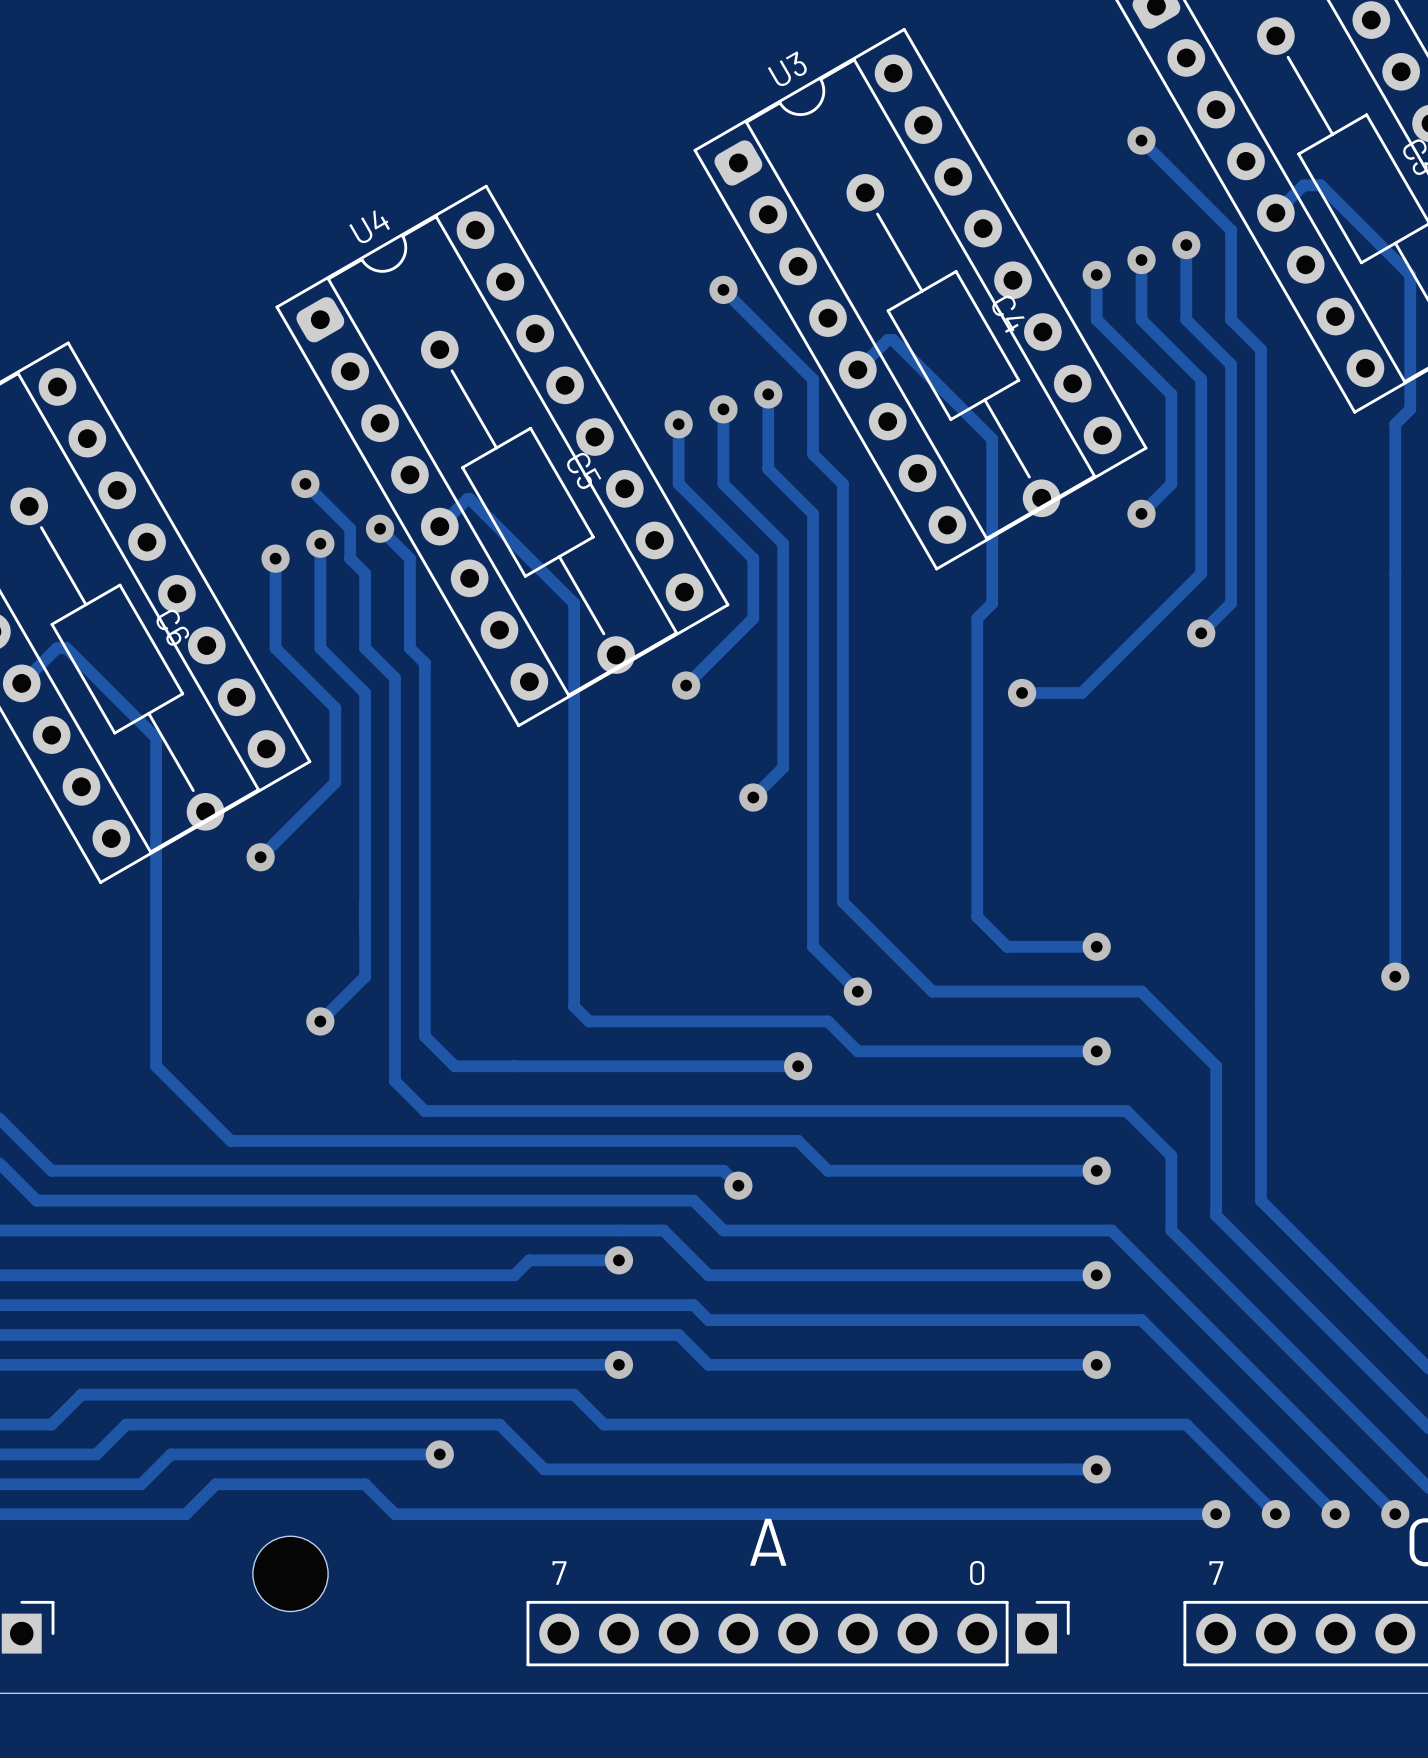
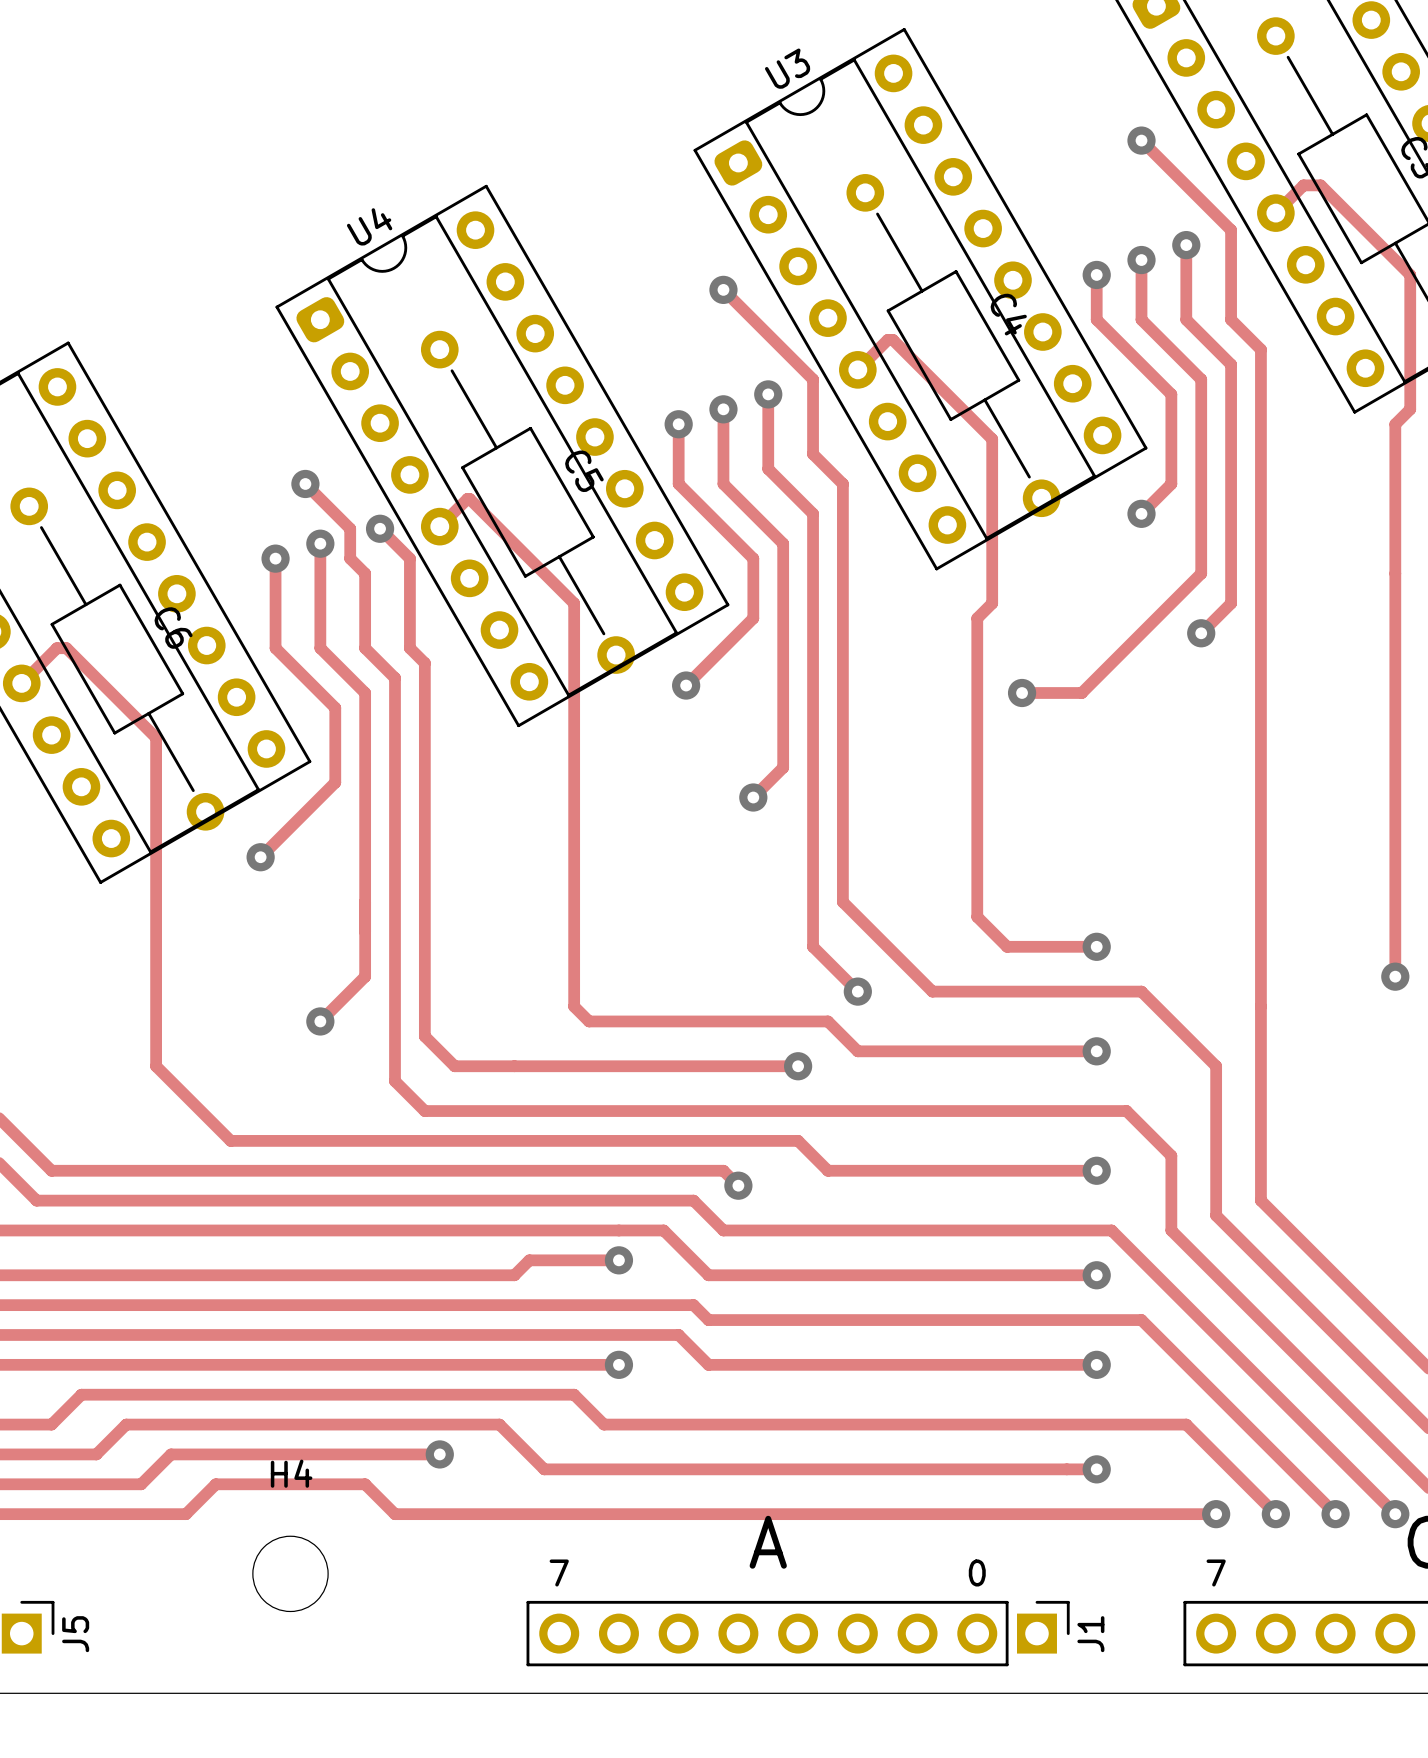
H4 name: none -> H4 (291, 1473)
J5 name: none -> J5 (75, 1634)
J1 name: none -> J1 (1090, 1634)

